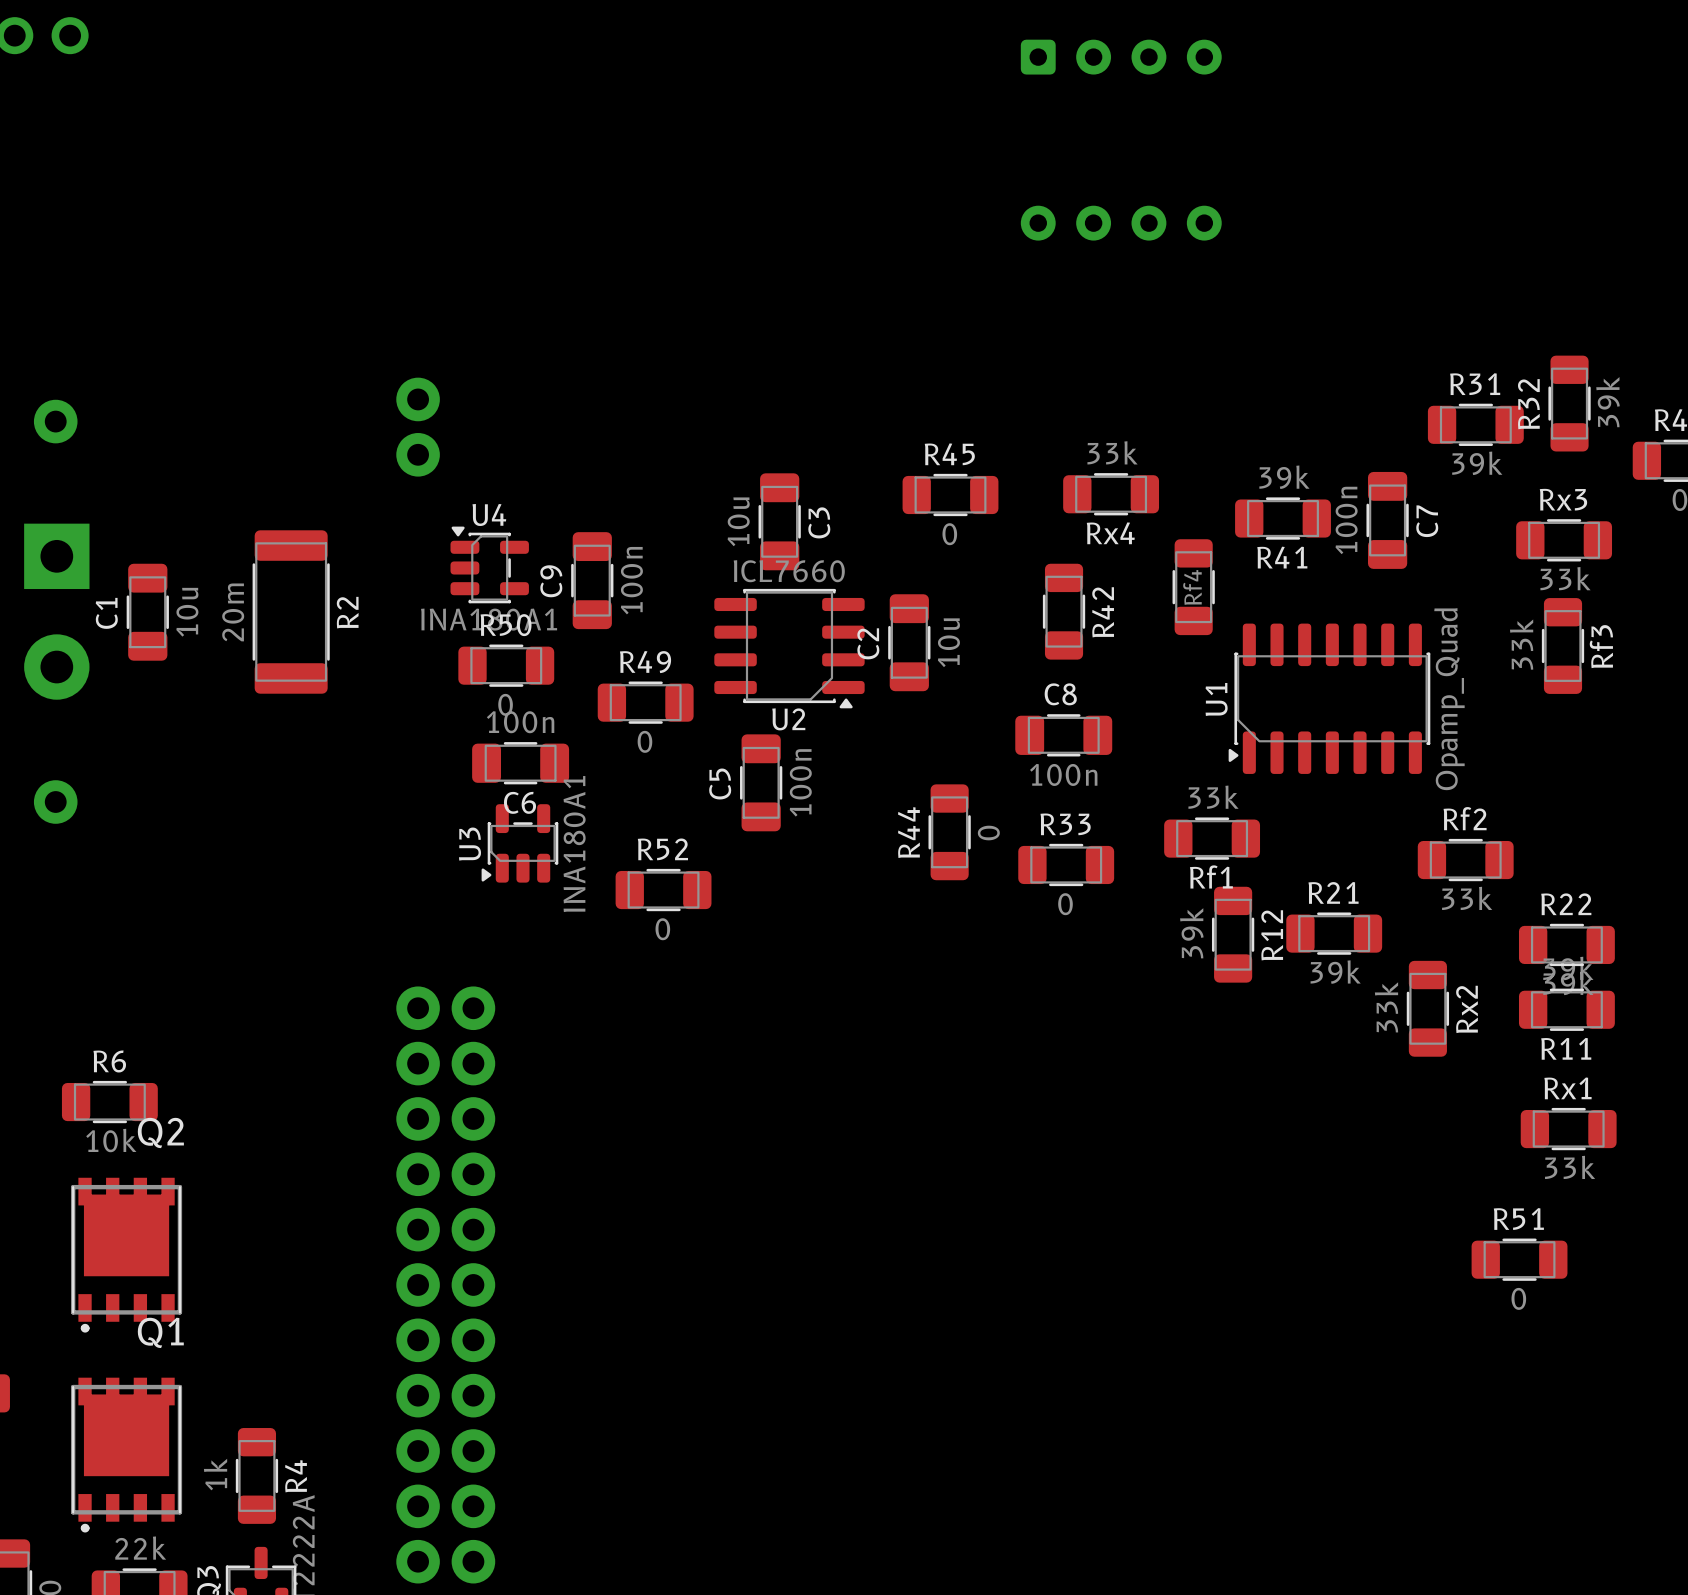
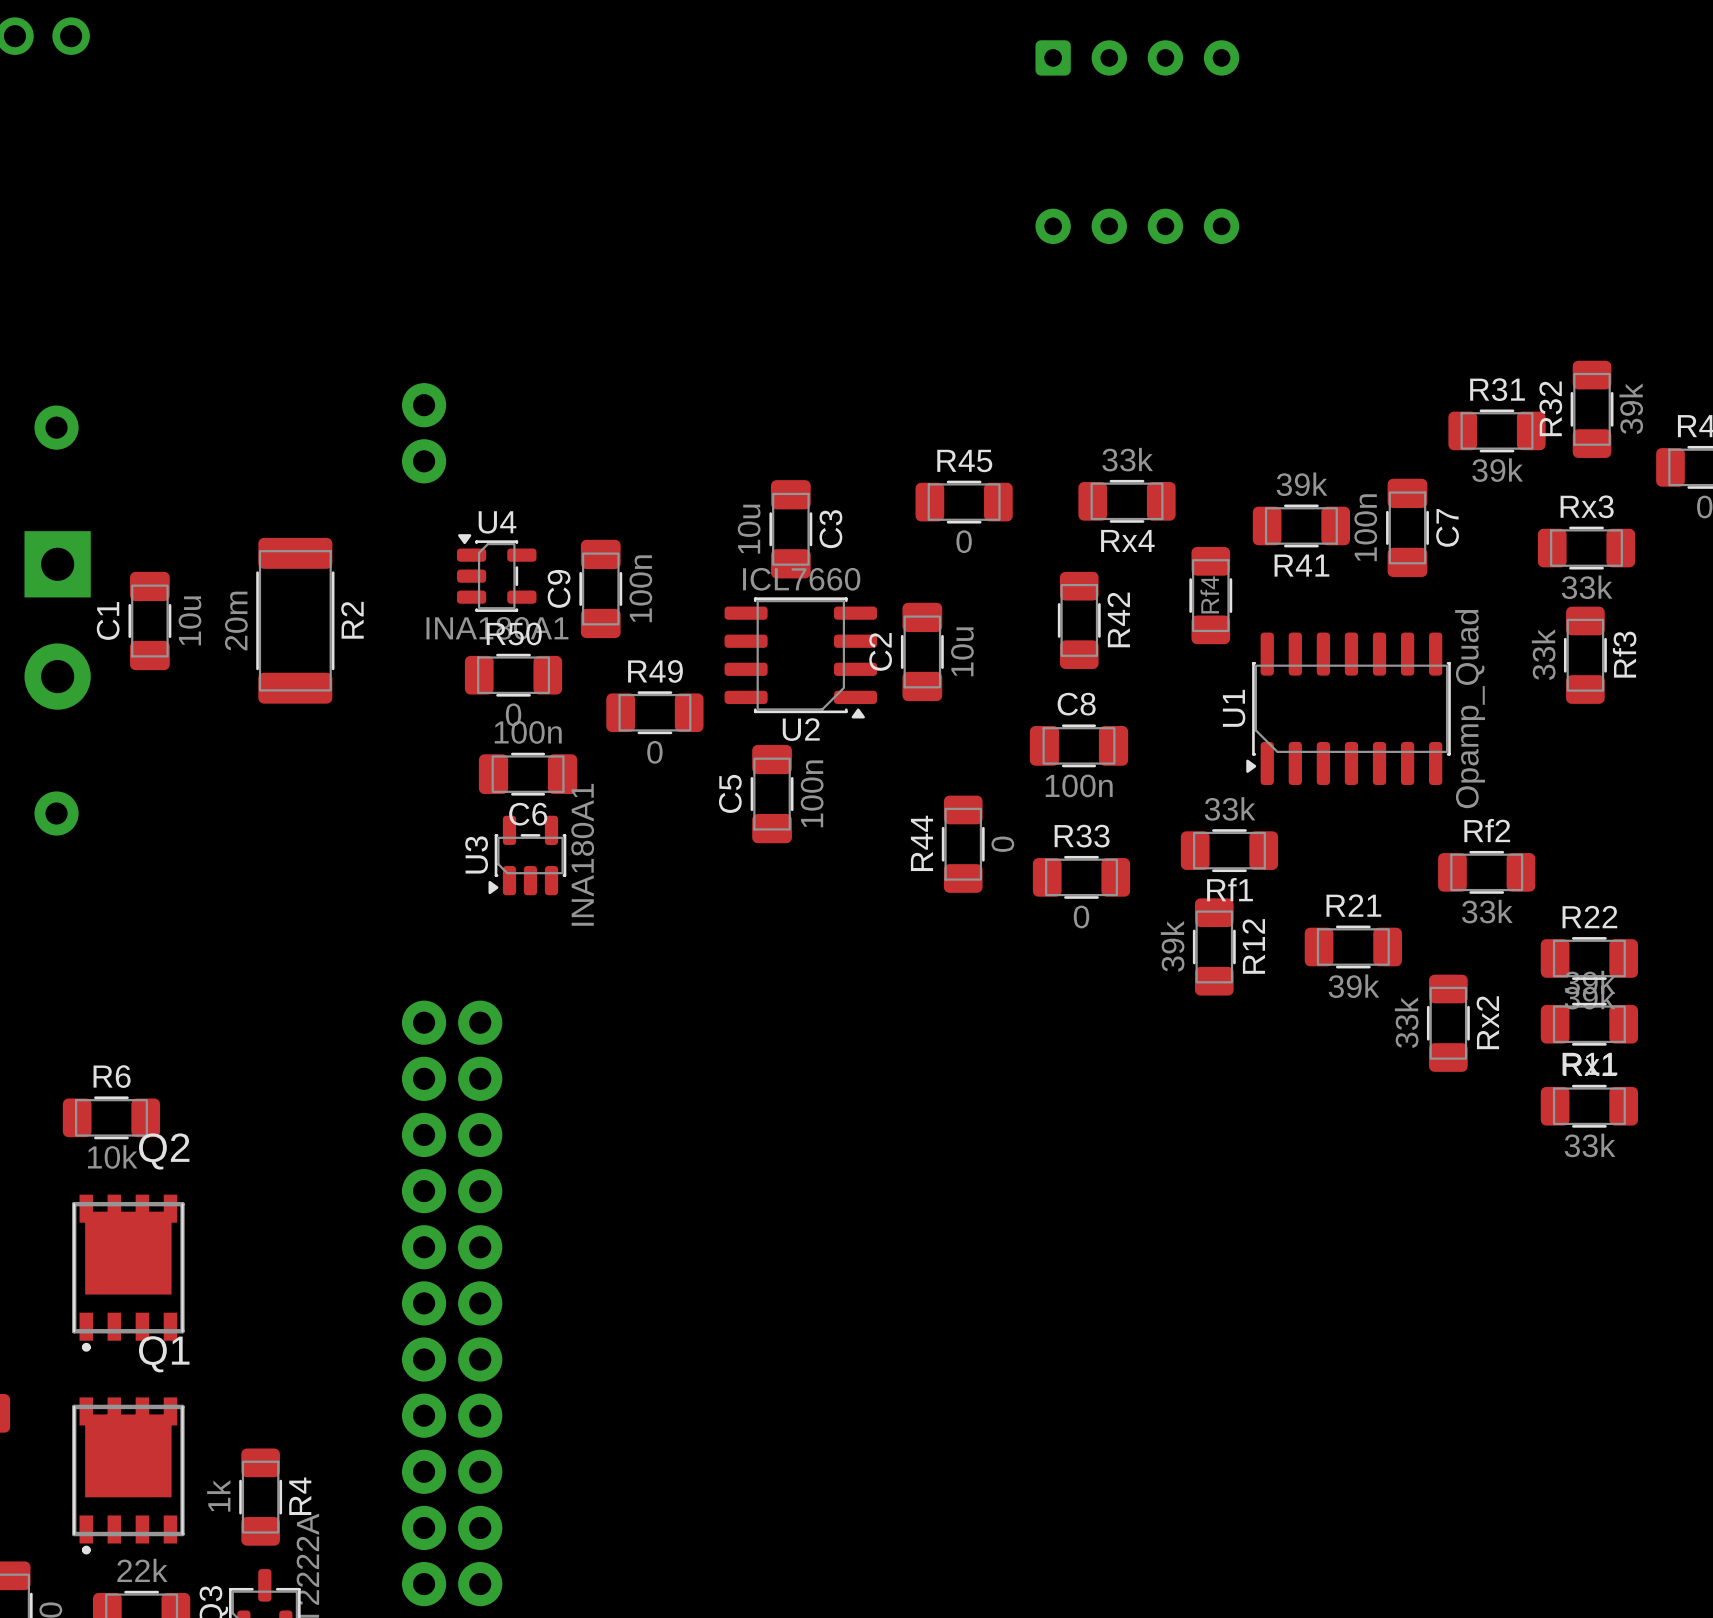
R52: 0 (663, 890) -> none
R12 position: (1233, 934) -> (1214, 946)
Rx1 position: (1568, 1129) -> (1589, 1106)
R51: 0 (1519, 1259) -> none

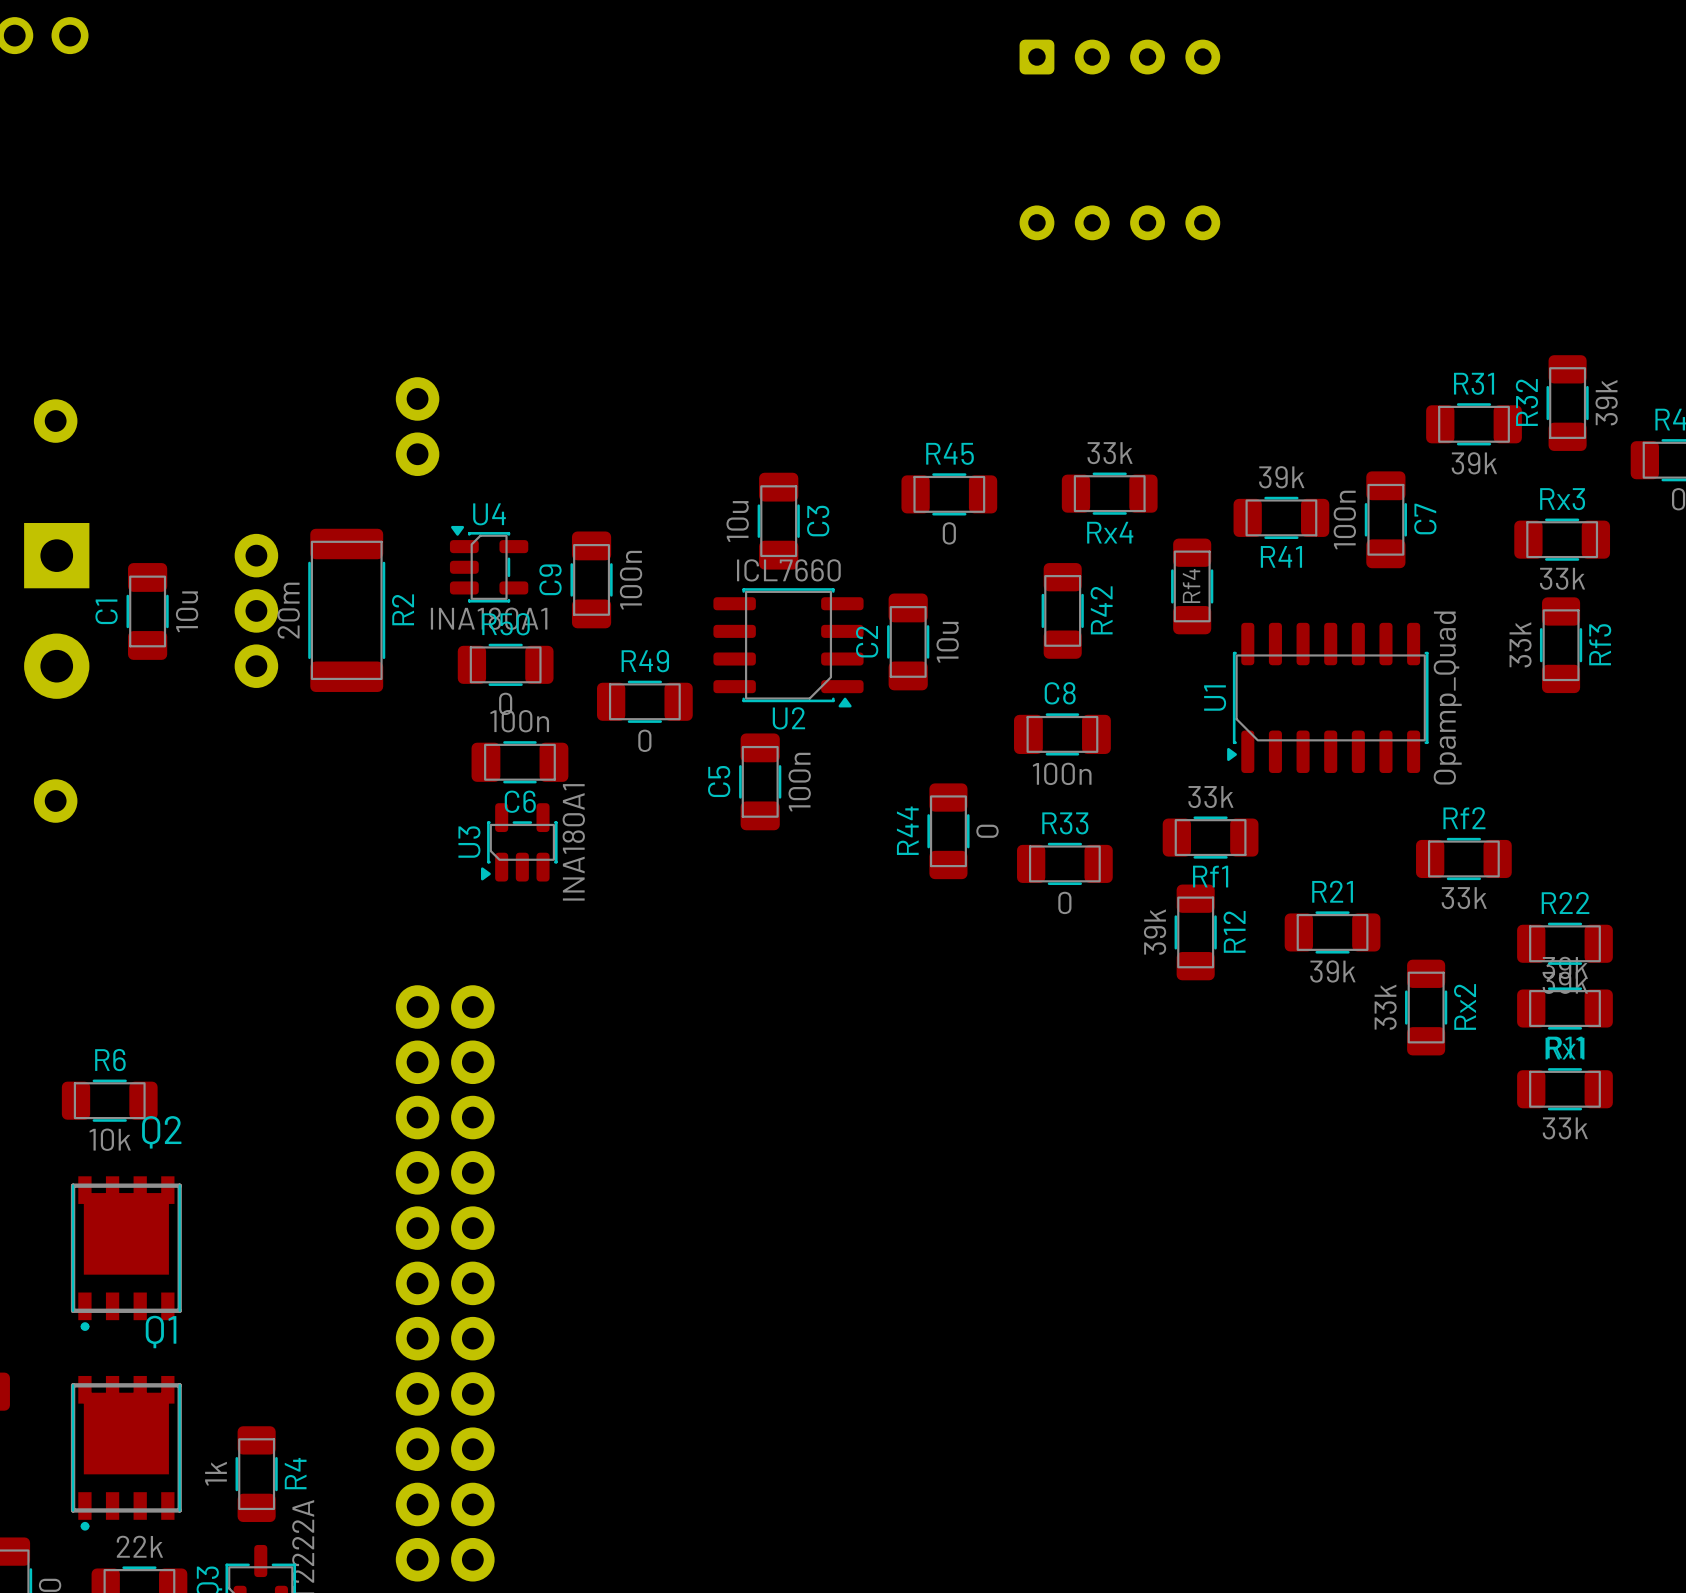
part: none -> (256, 610)
R2 position: (295, 620) -> (346, 610)

